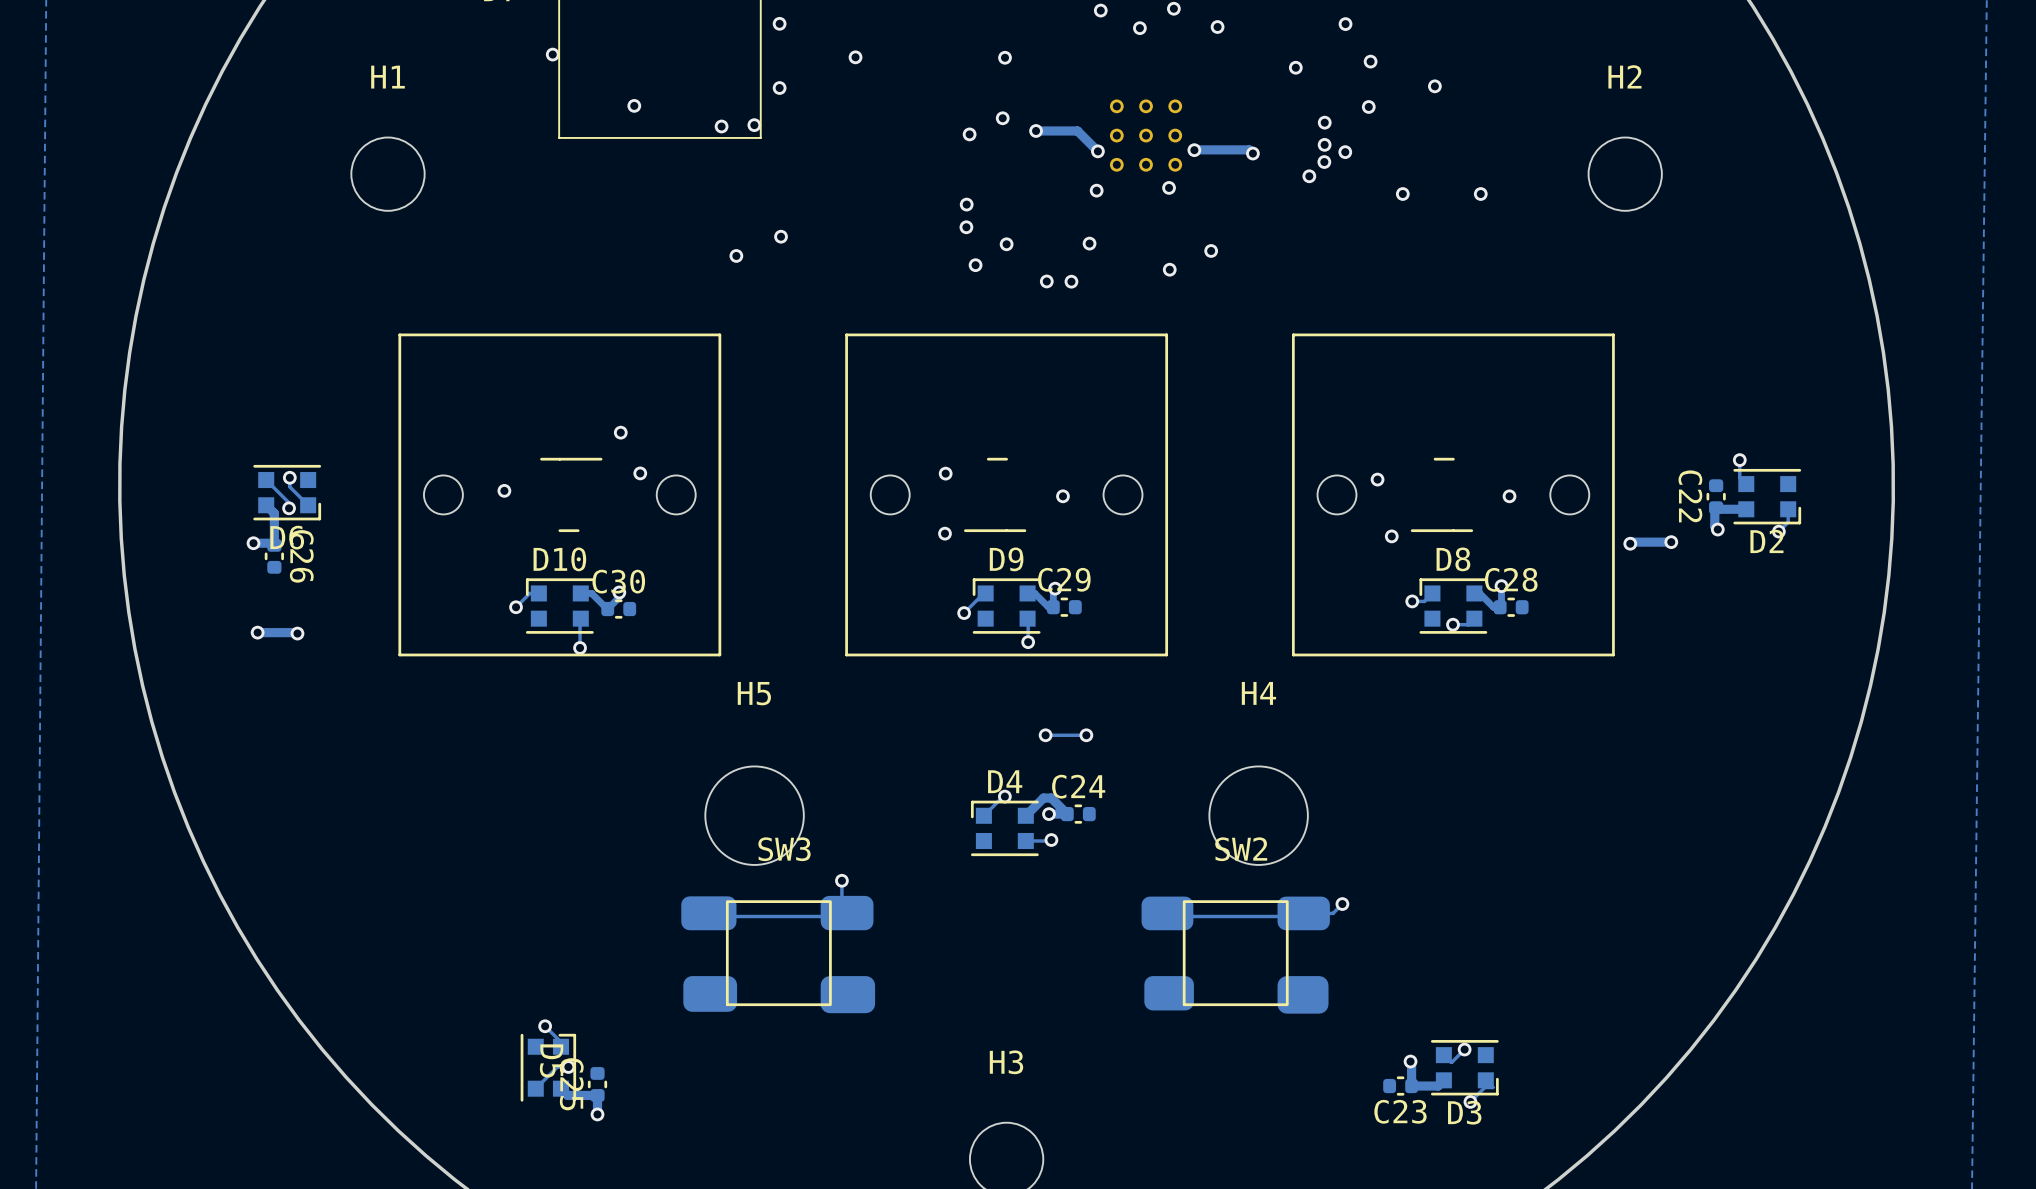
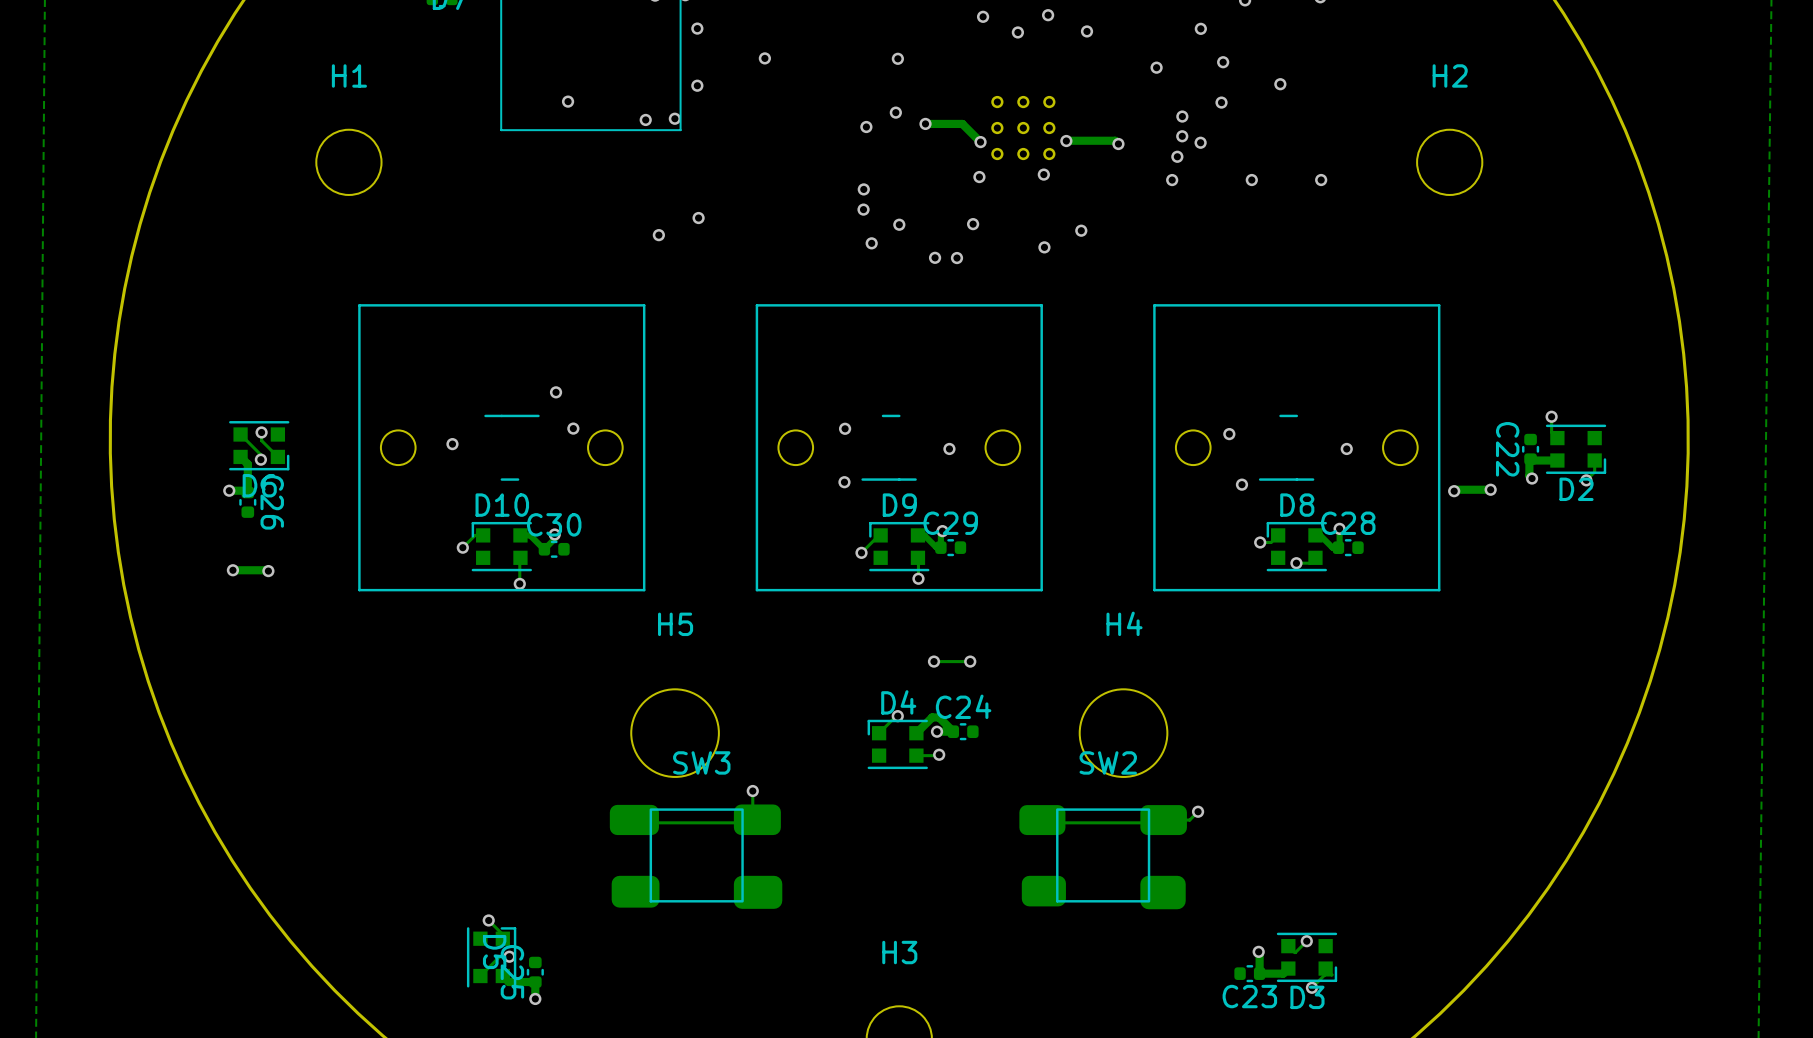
via: (552, 54) -> none
via: (1324, 162) -> none
via: none -> (1177, 156)
via: (1309, 176) -> none
via: none -> (1172, 180)

